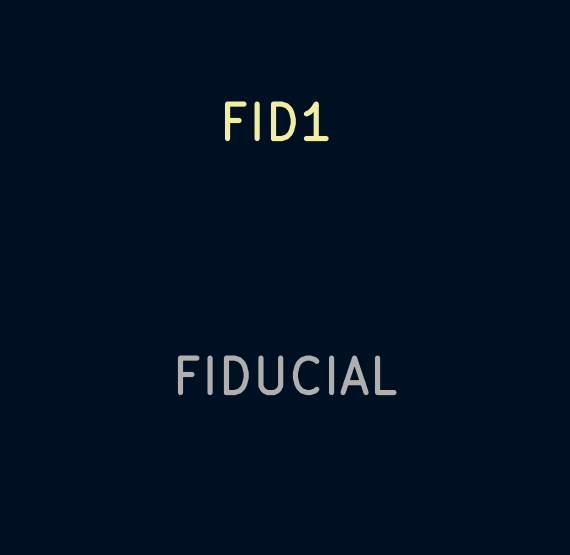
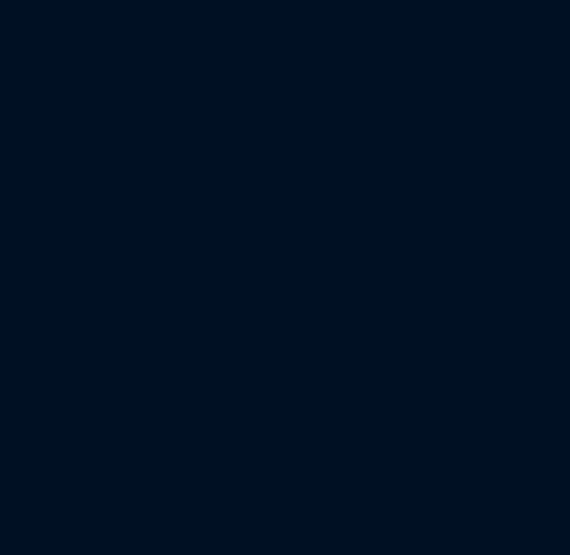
FID1: FIDUCIAL (287, 248) -> none

